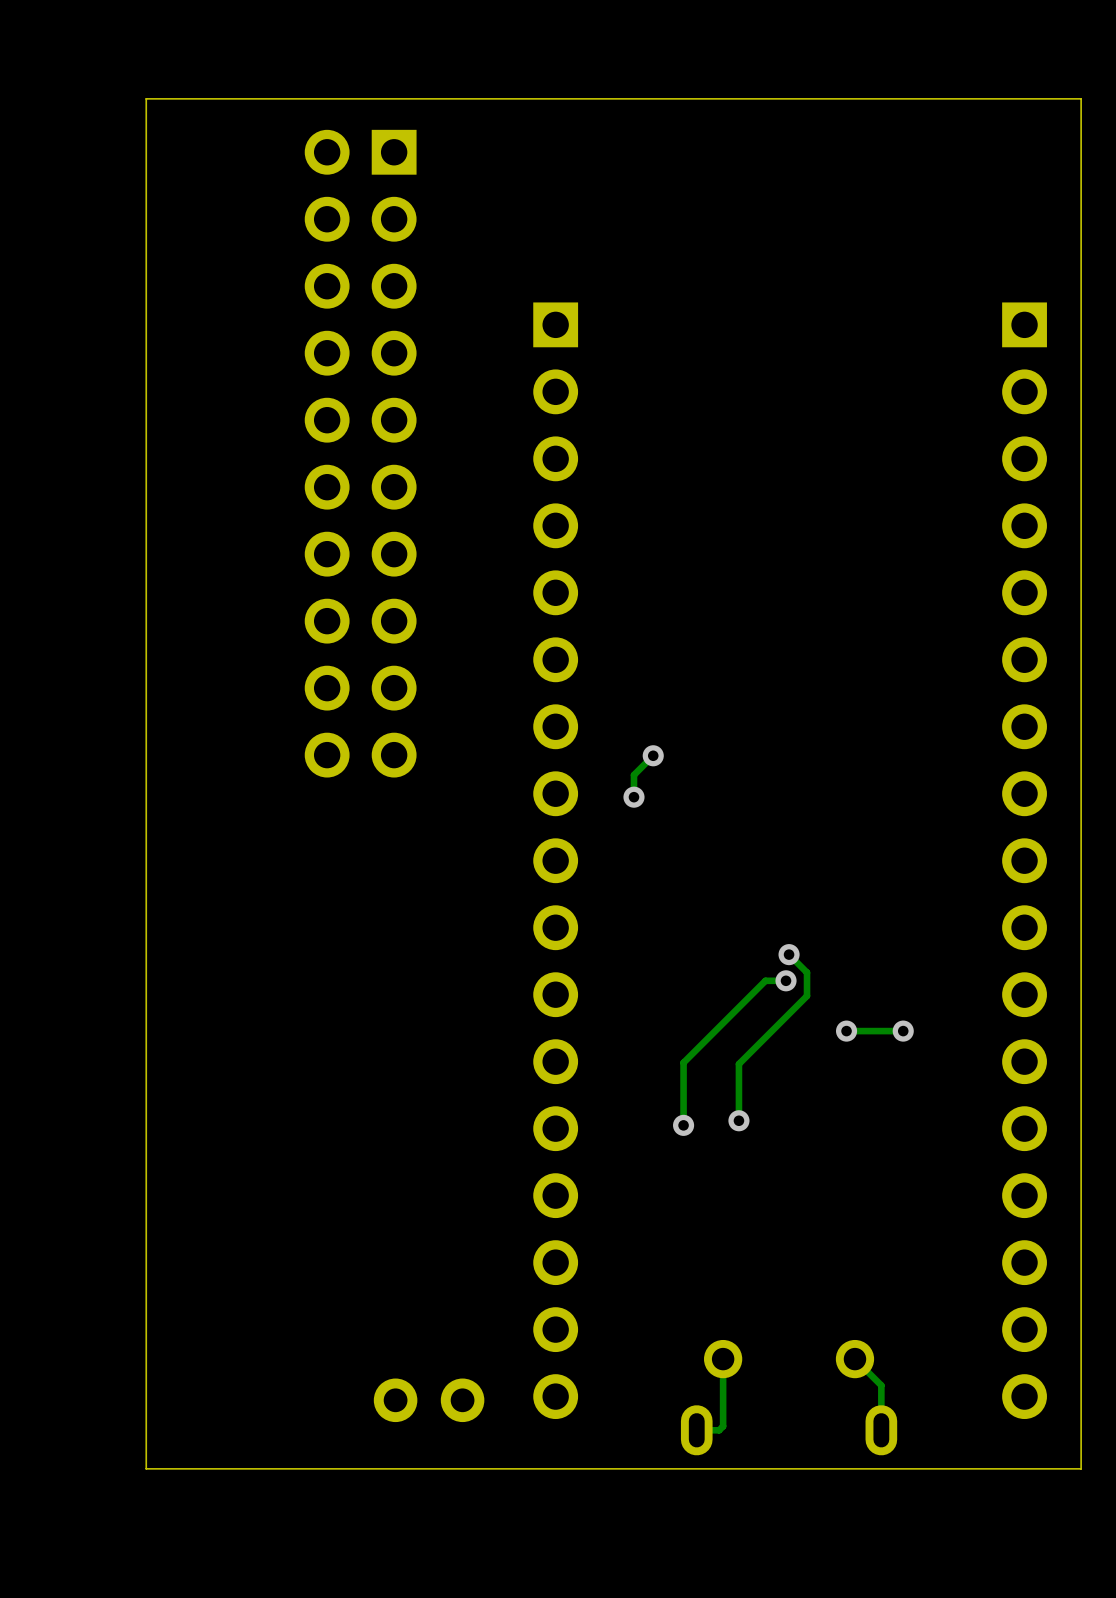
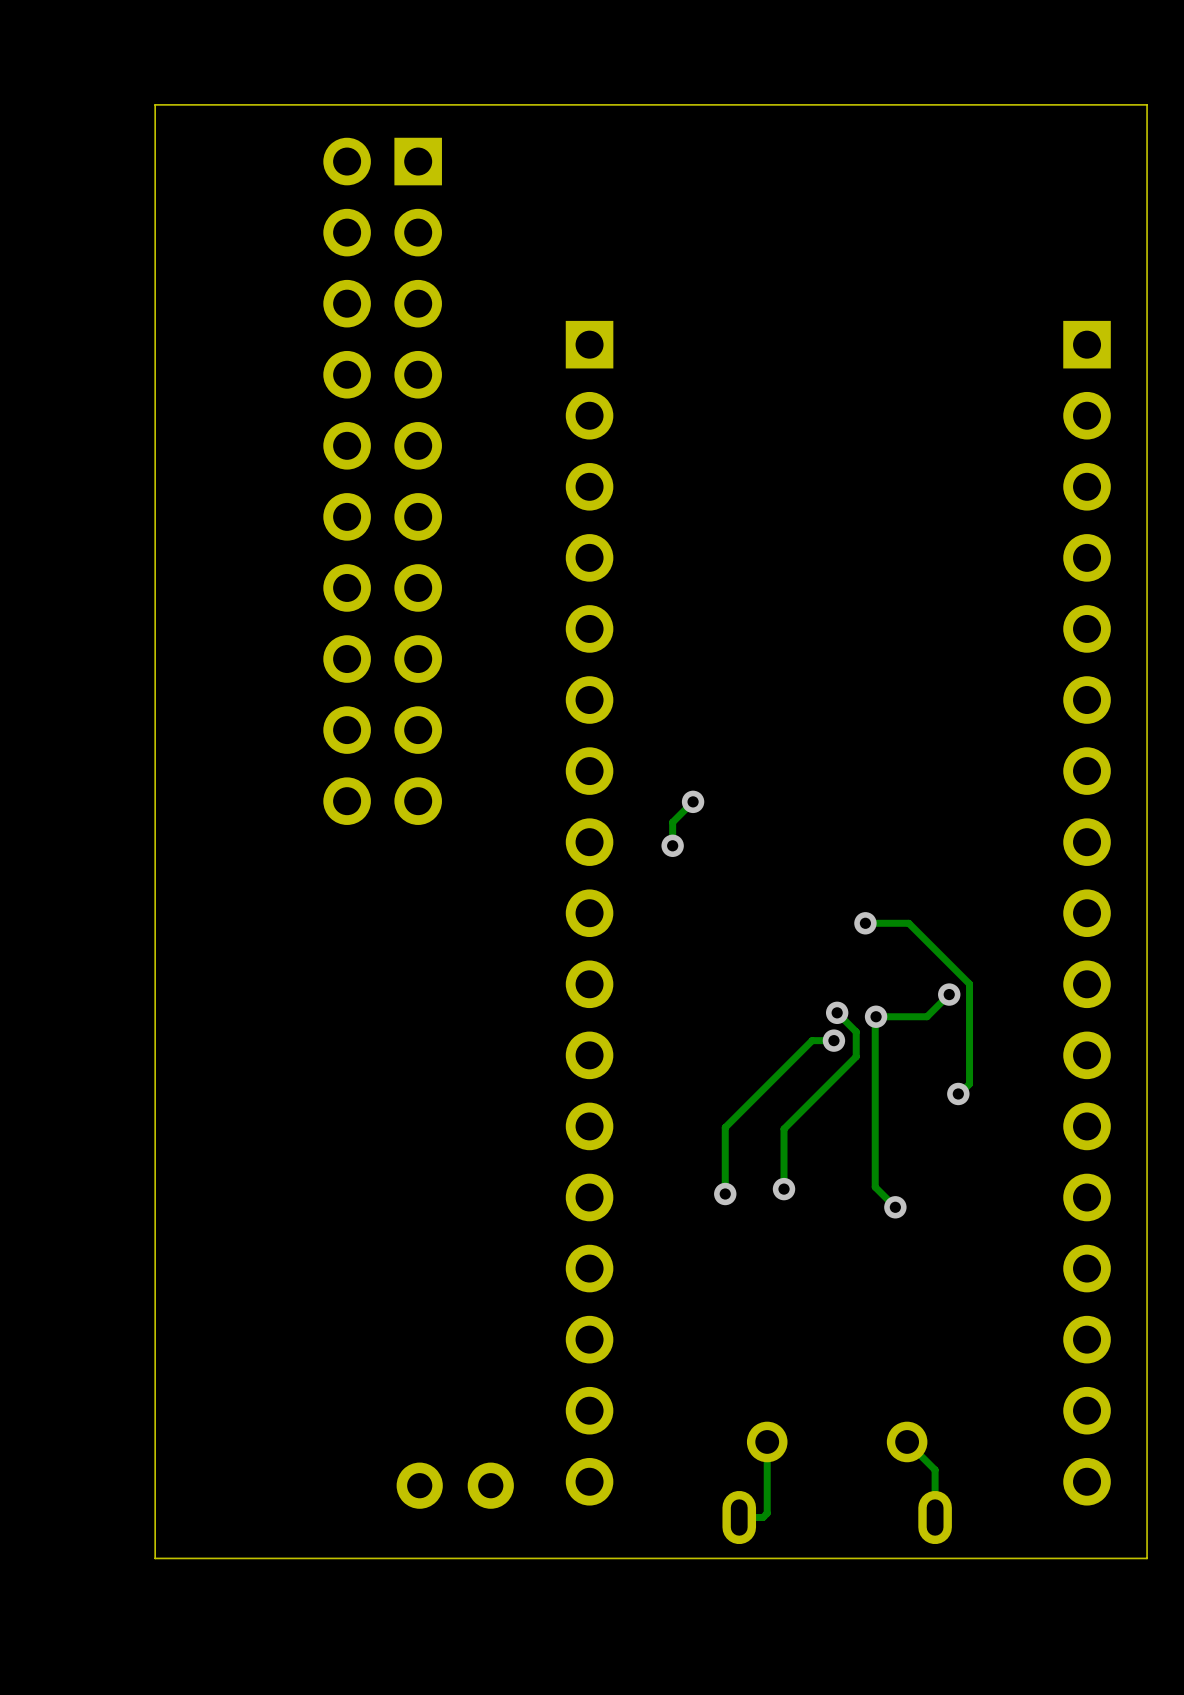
track: none -> (865, 923) (908, 923) (969, 984) (969, 1084) (959, 1093)
via: none -> (865, 923)
track: none -> (949, 994) (927, 1016) (875, 1017) (875, 1187) (895, 1207)
via: none -> (949, 994)
via: none -> (876, 1016)
via: (846, 1031) -> none
track: (903, 1031) (846, 1031) -> none
via: none -> (895, 1207)

